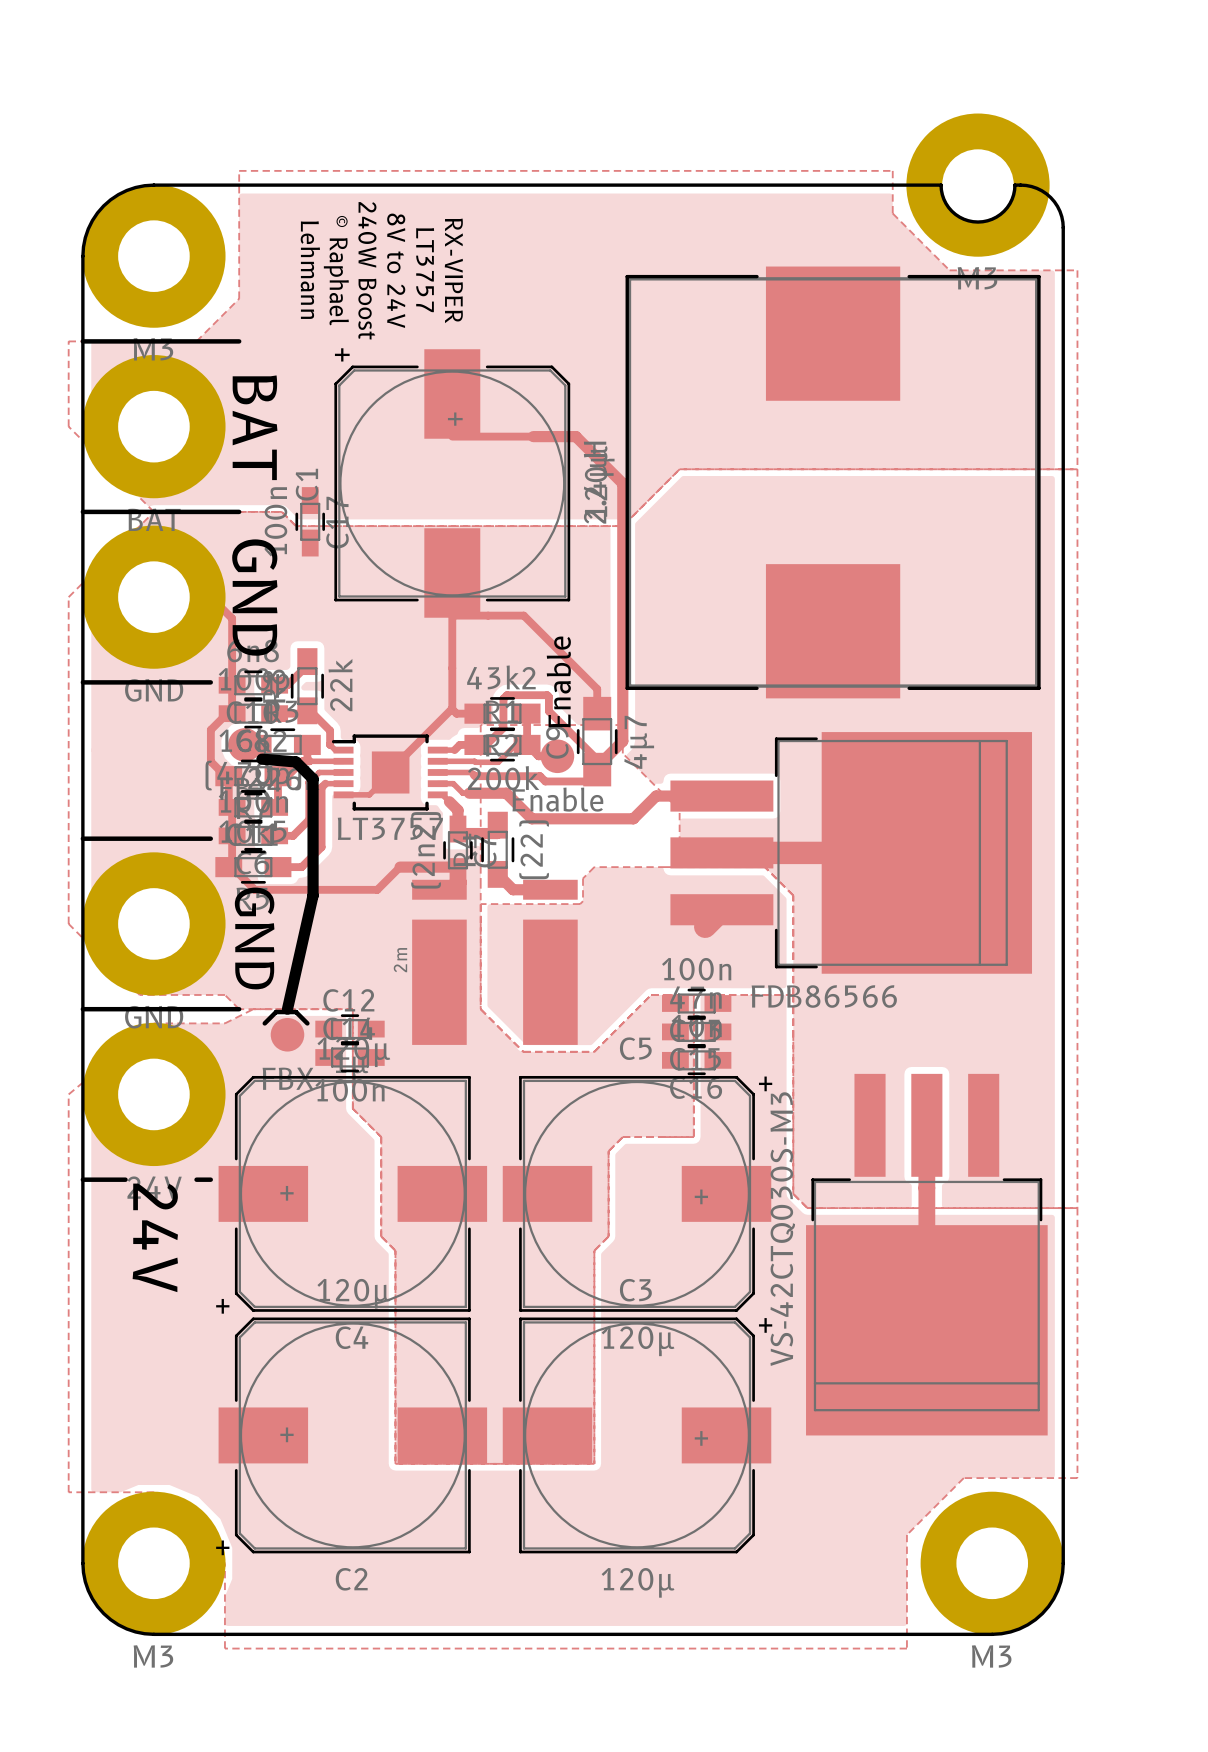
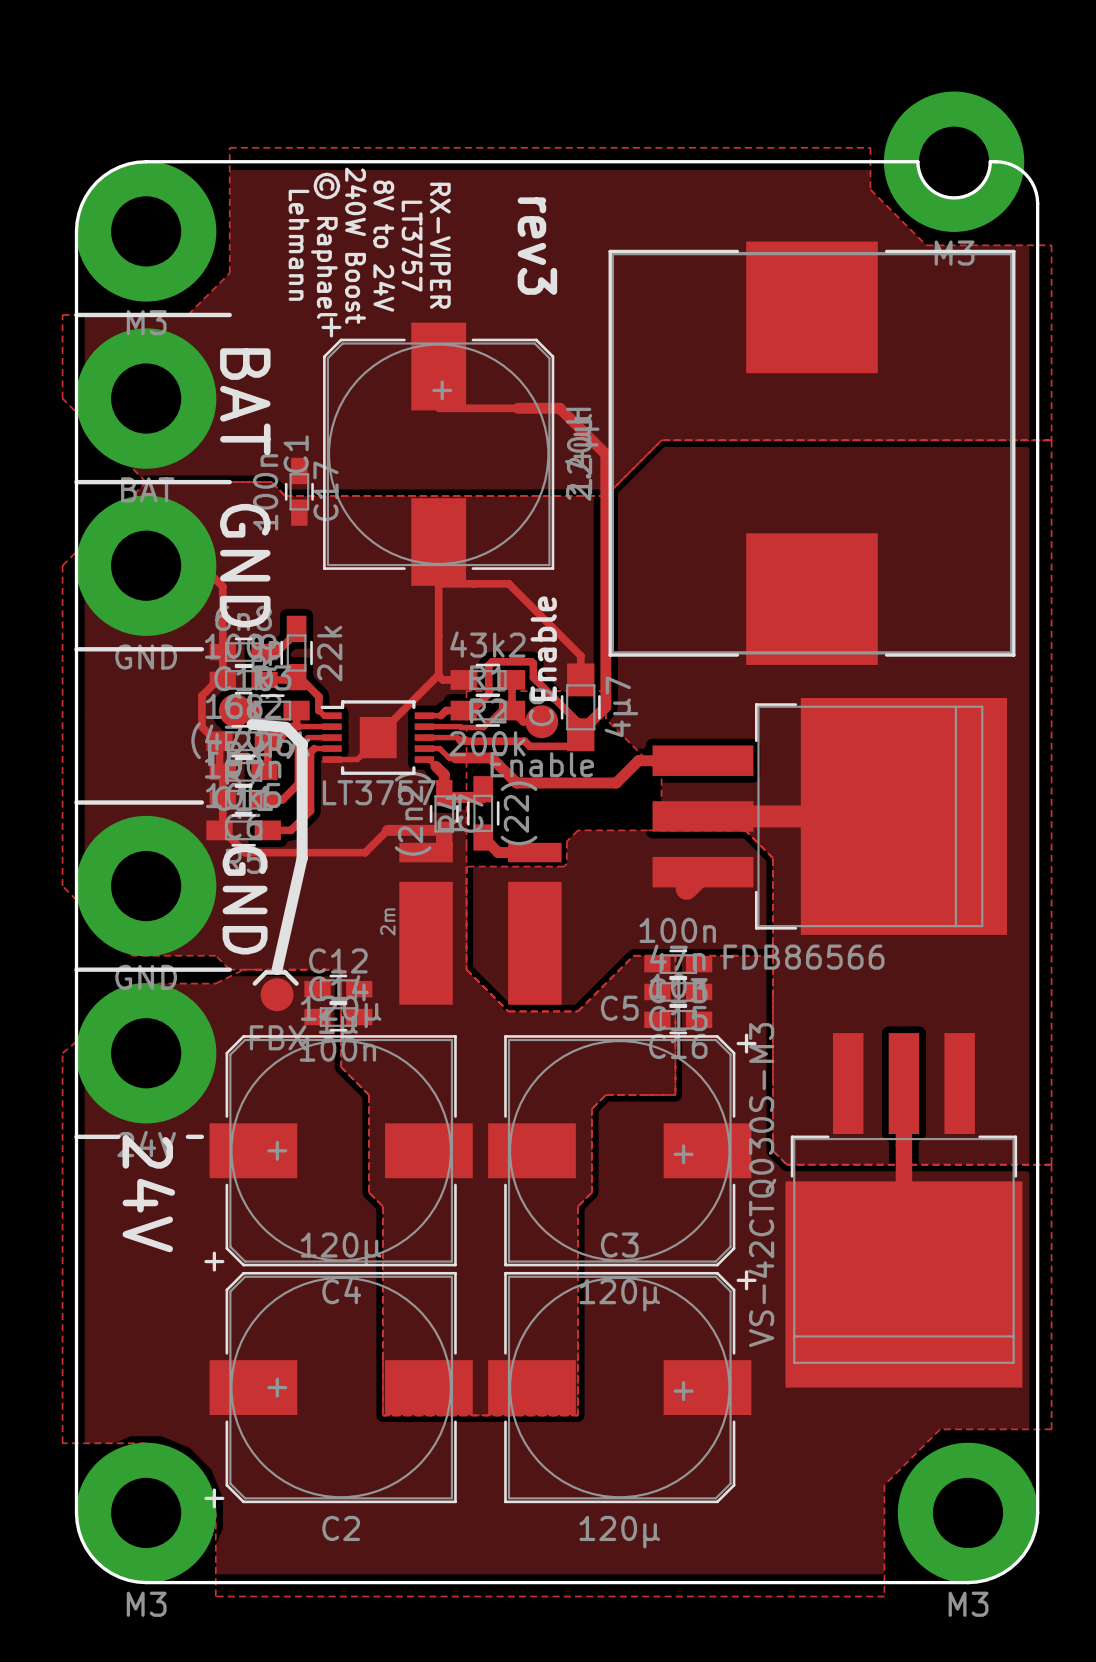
text: none -> rev3 (537, 246)

